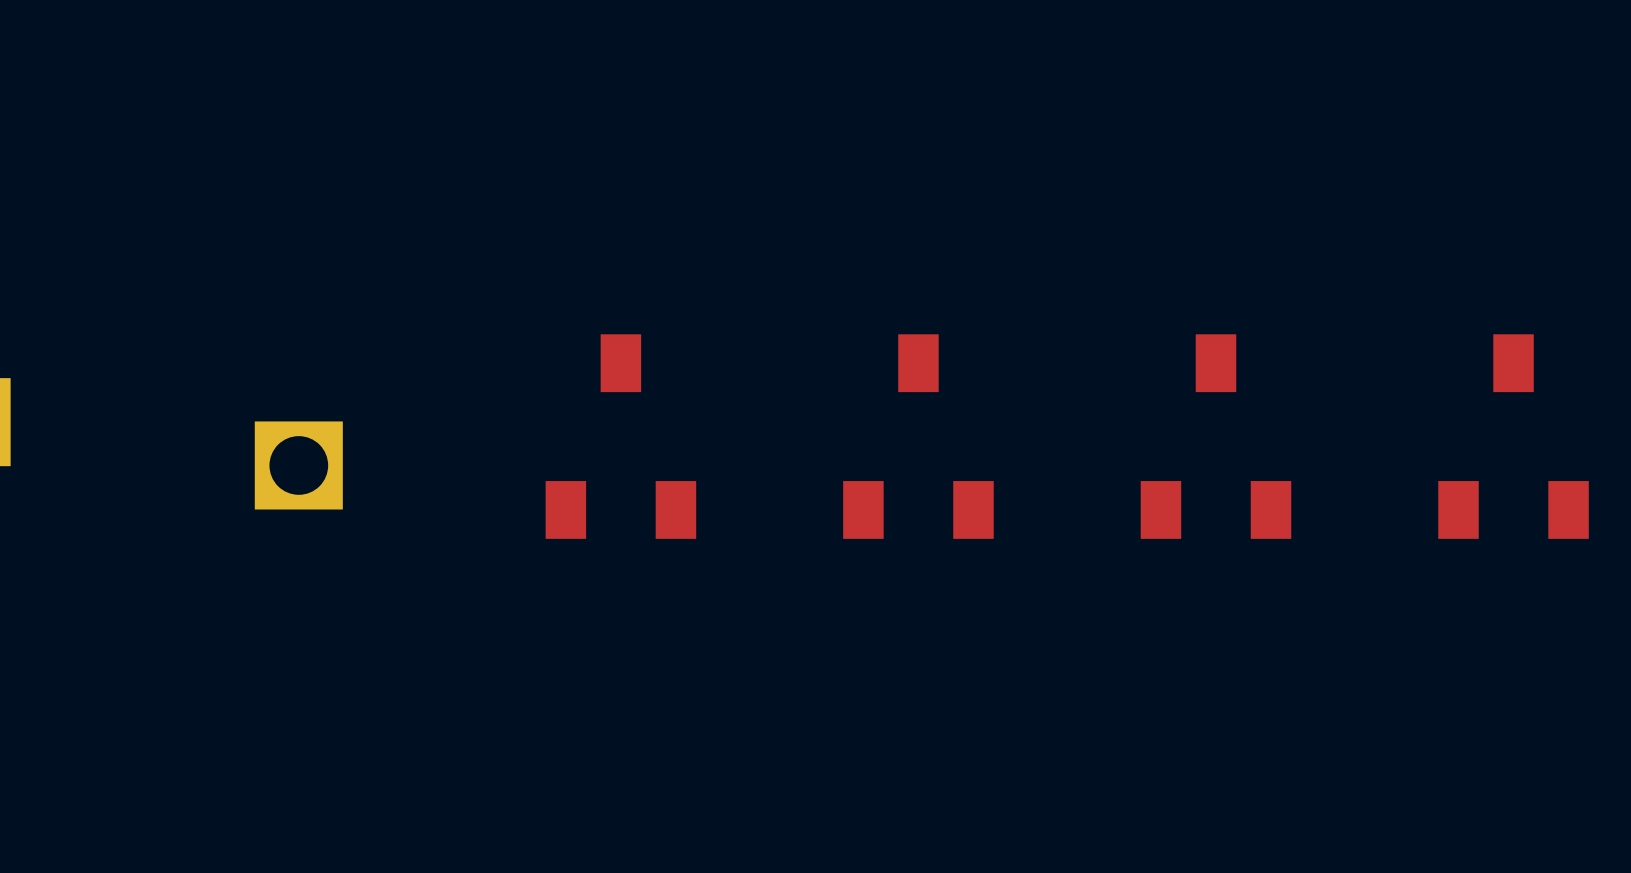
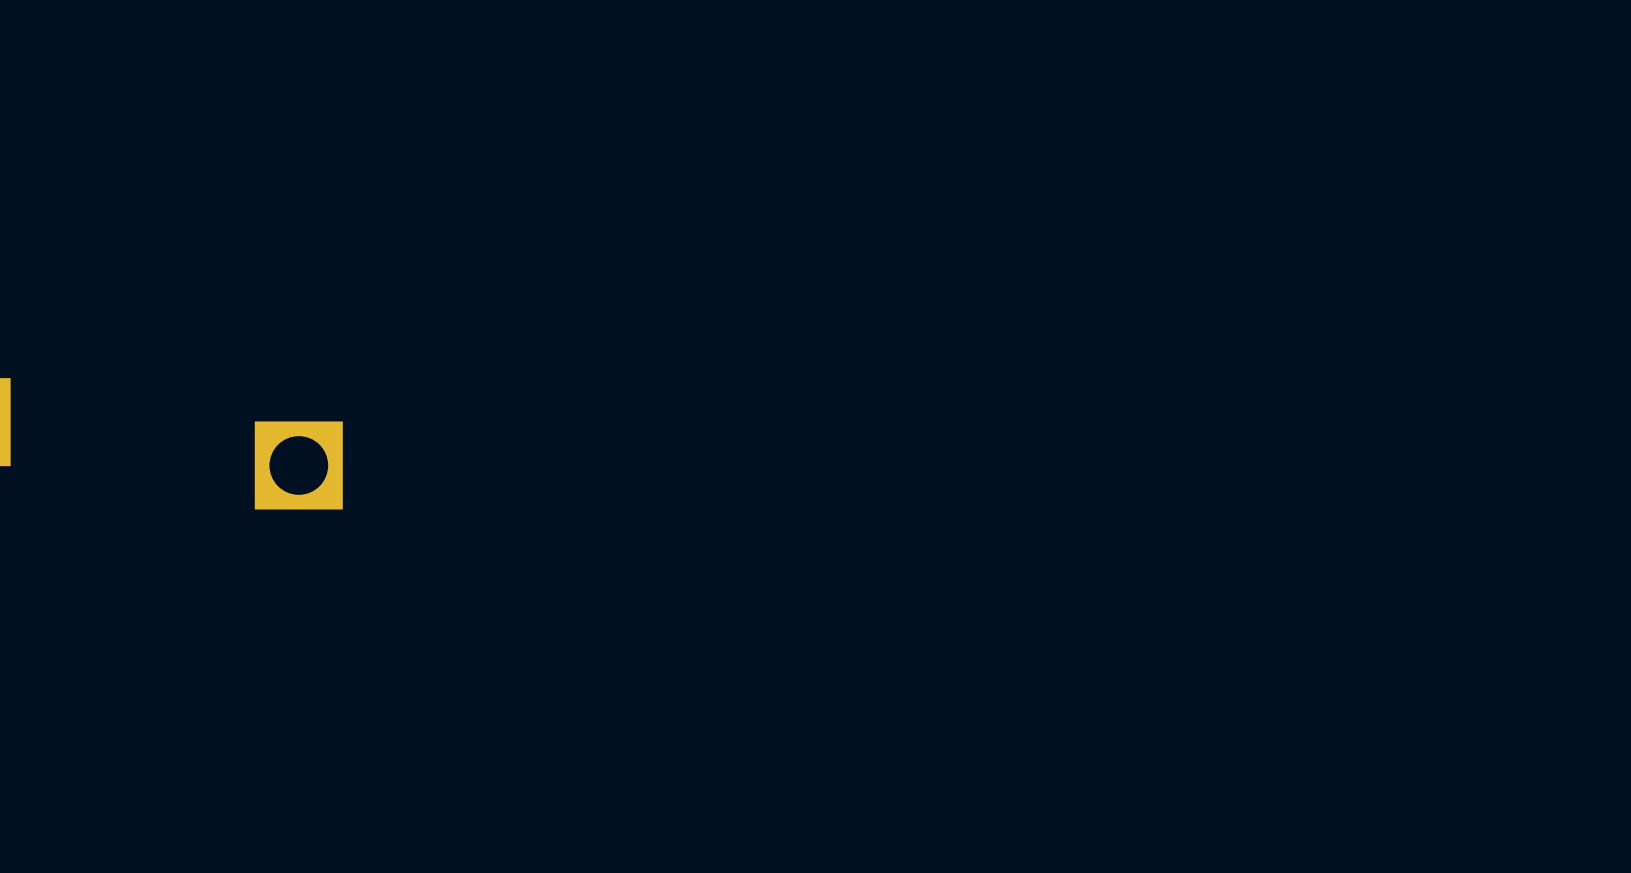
part: (620, 436) -> none
part: (918, 436) -> none
part: (1215, 436) -> none
part: (1513, 436) -> none

